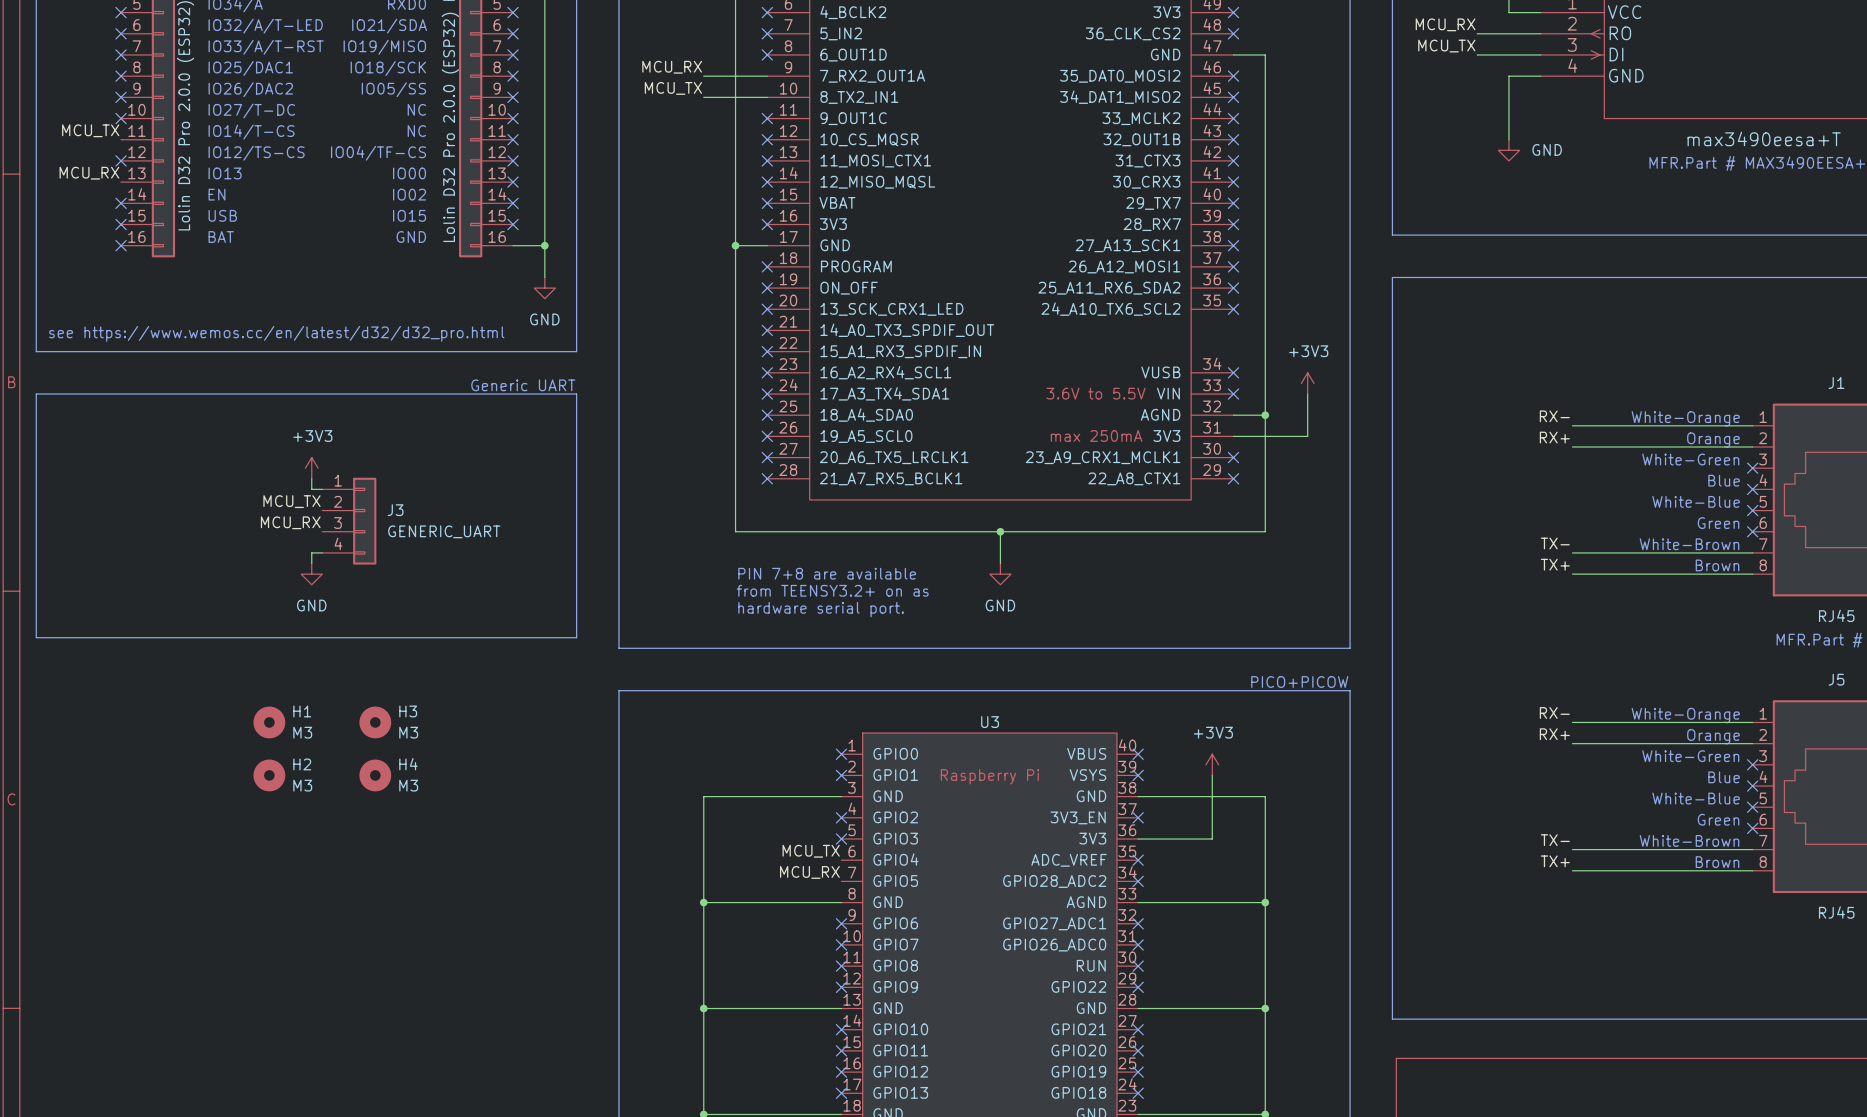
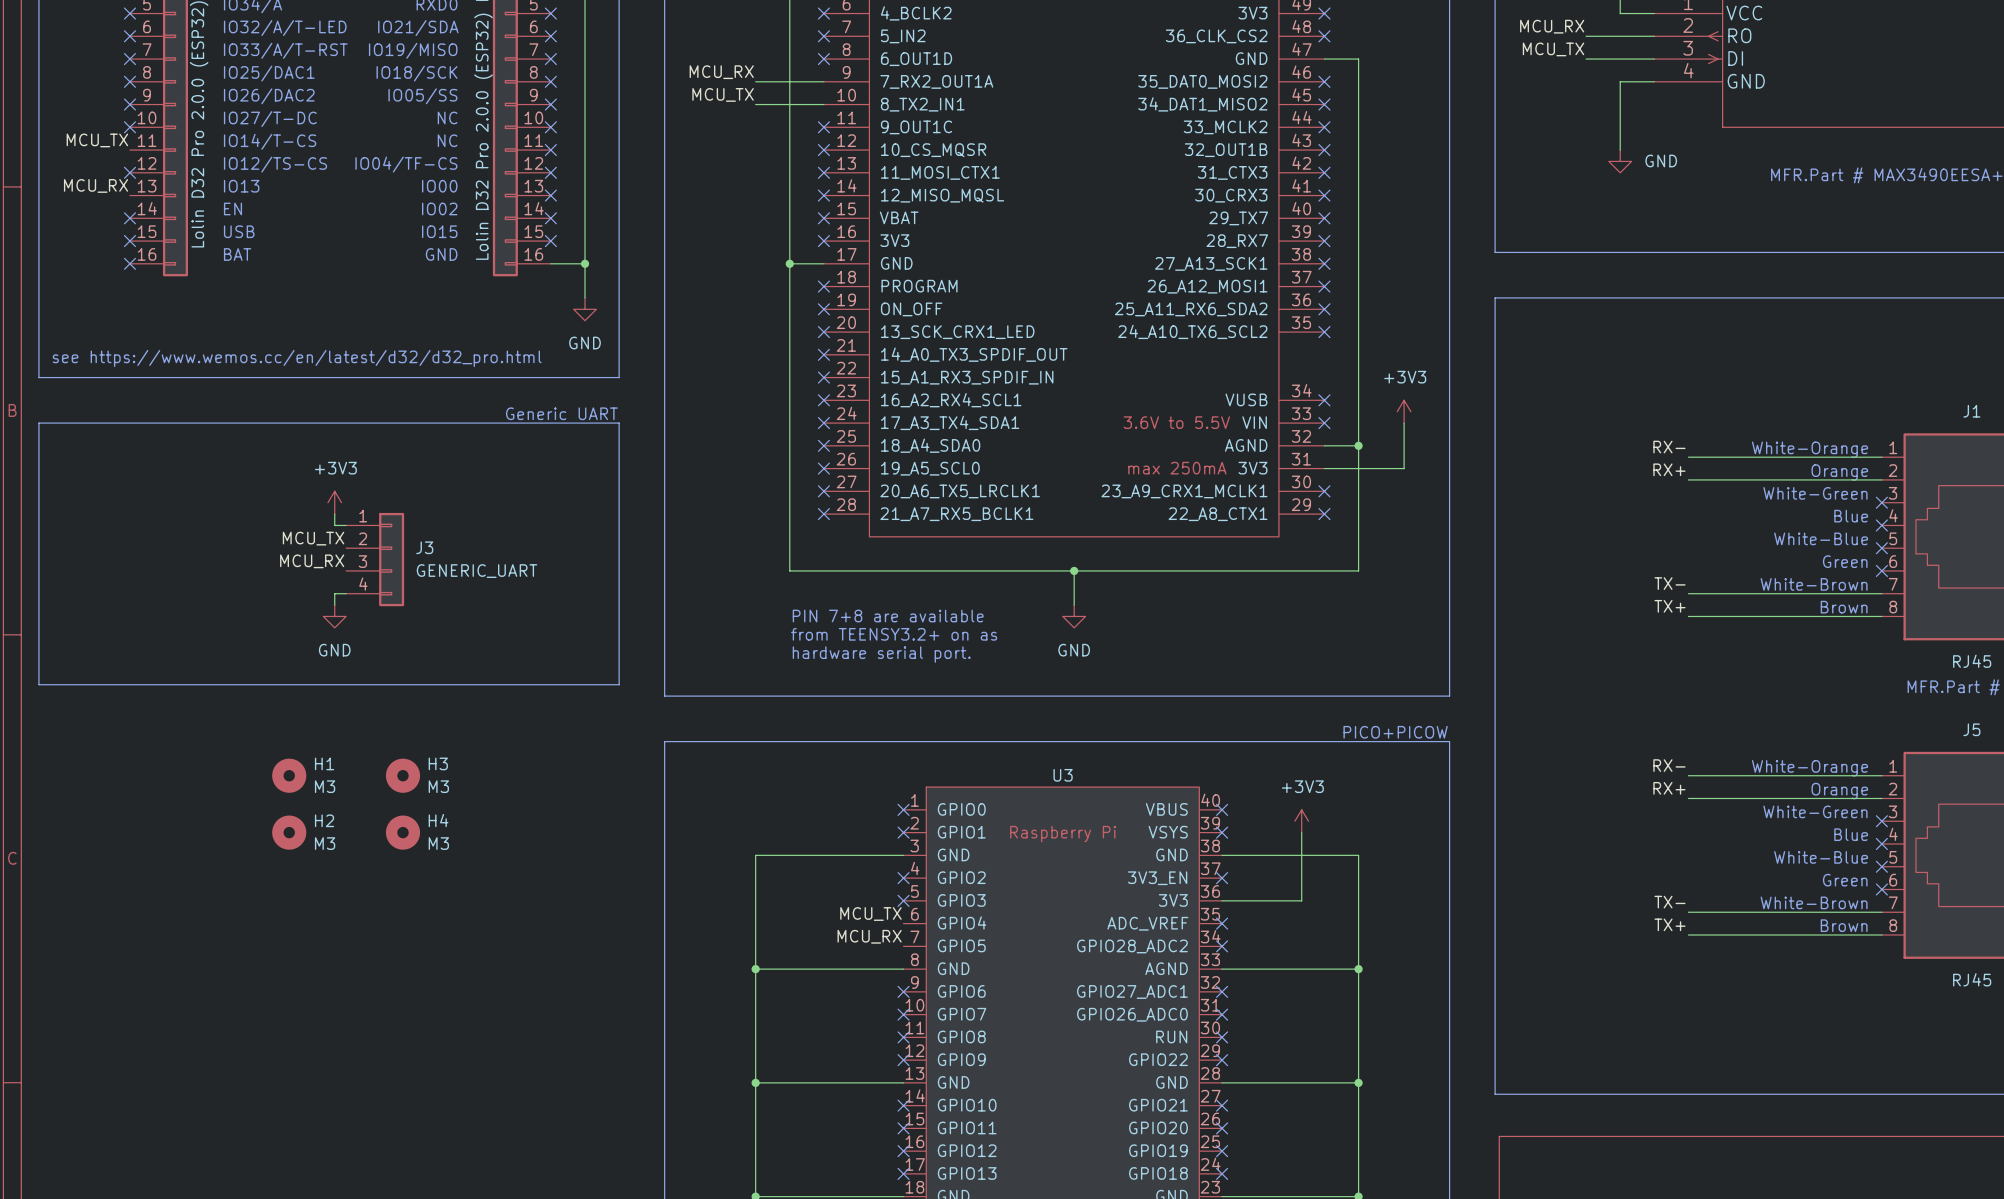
part value: max3490eesa+T (1764, 138) -> none

